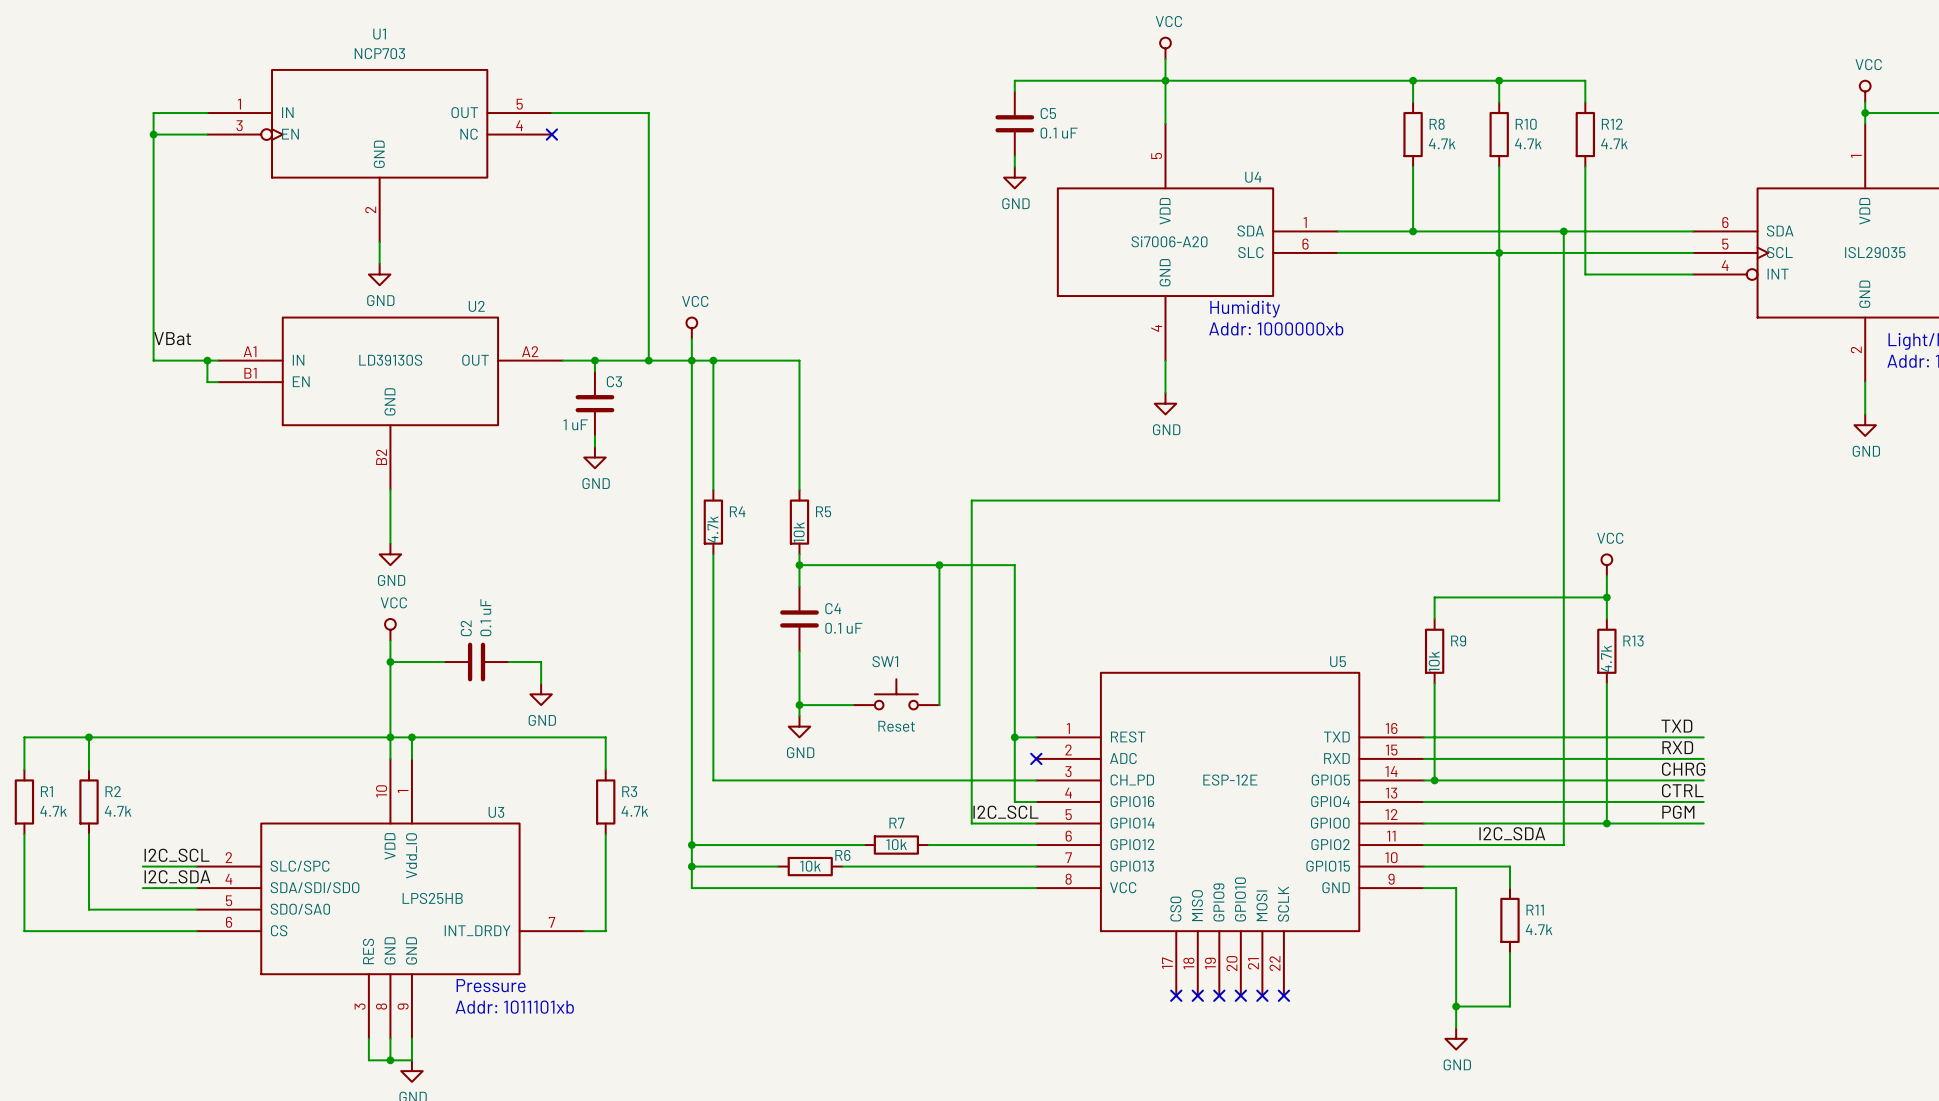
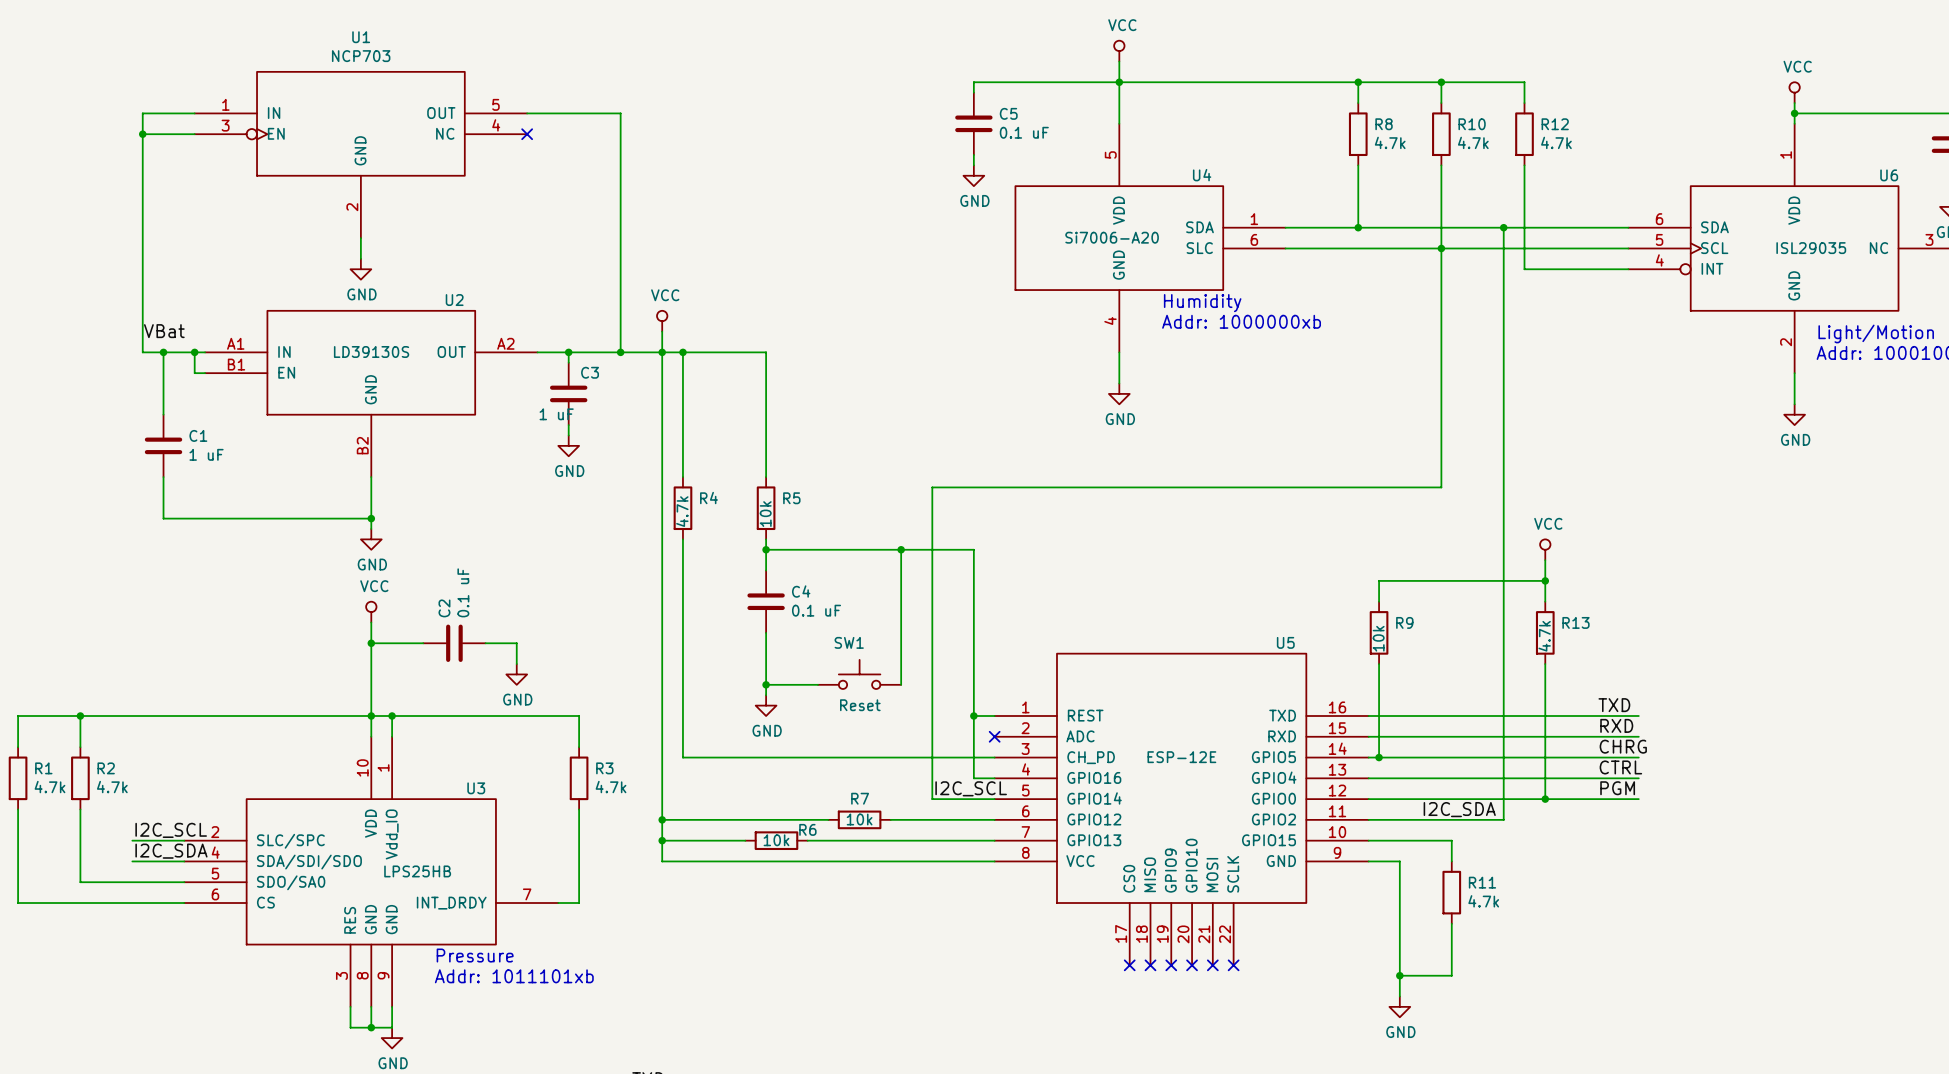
wire: none -> (163, 352) (163, 414)
junction: none -> (163, 352)
C1: none -> 1 uF (163, 445)
wire: none -> (163, 477) (163, 518) (371, 518)
junction: none -> (371, 518)

